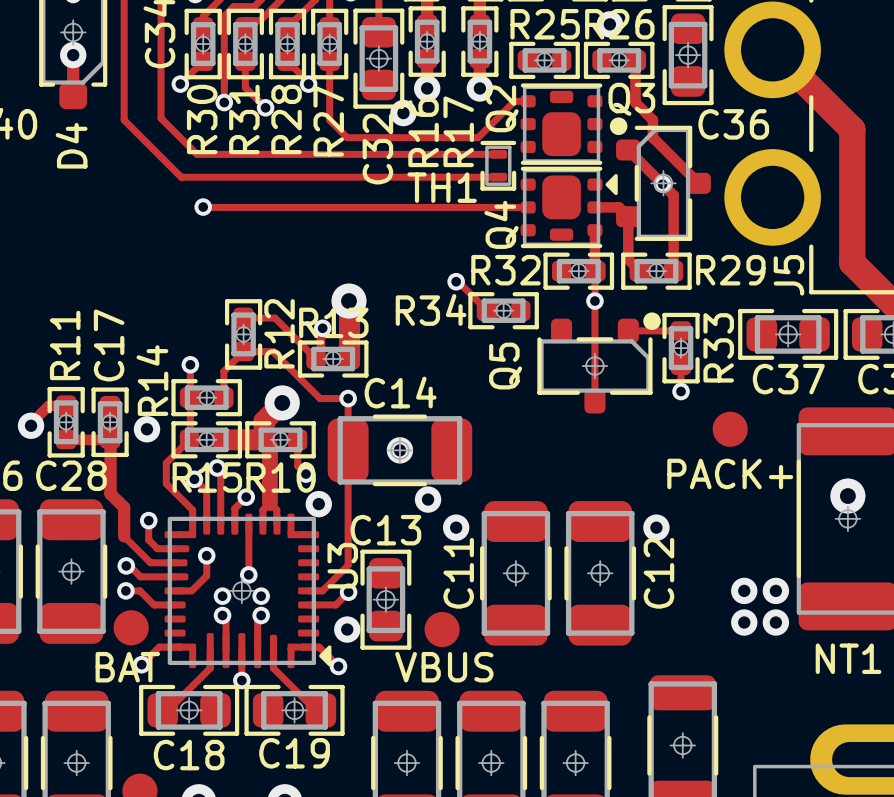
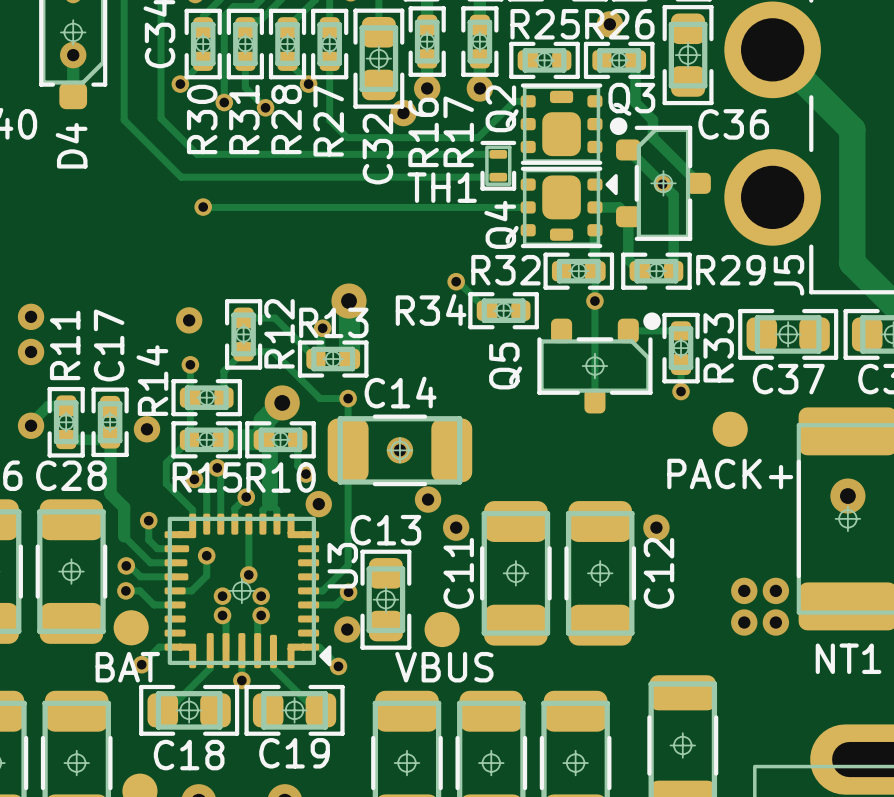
via: none -> (31, 316)
via: none -> (189, 320)
via: none -> (31, 351)

